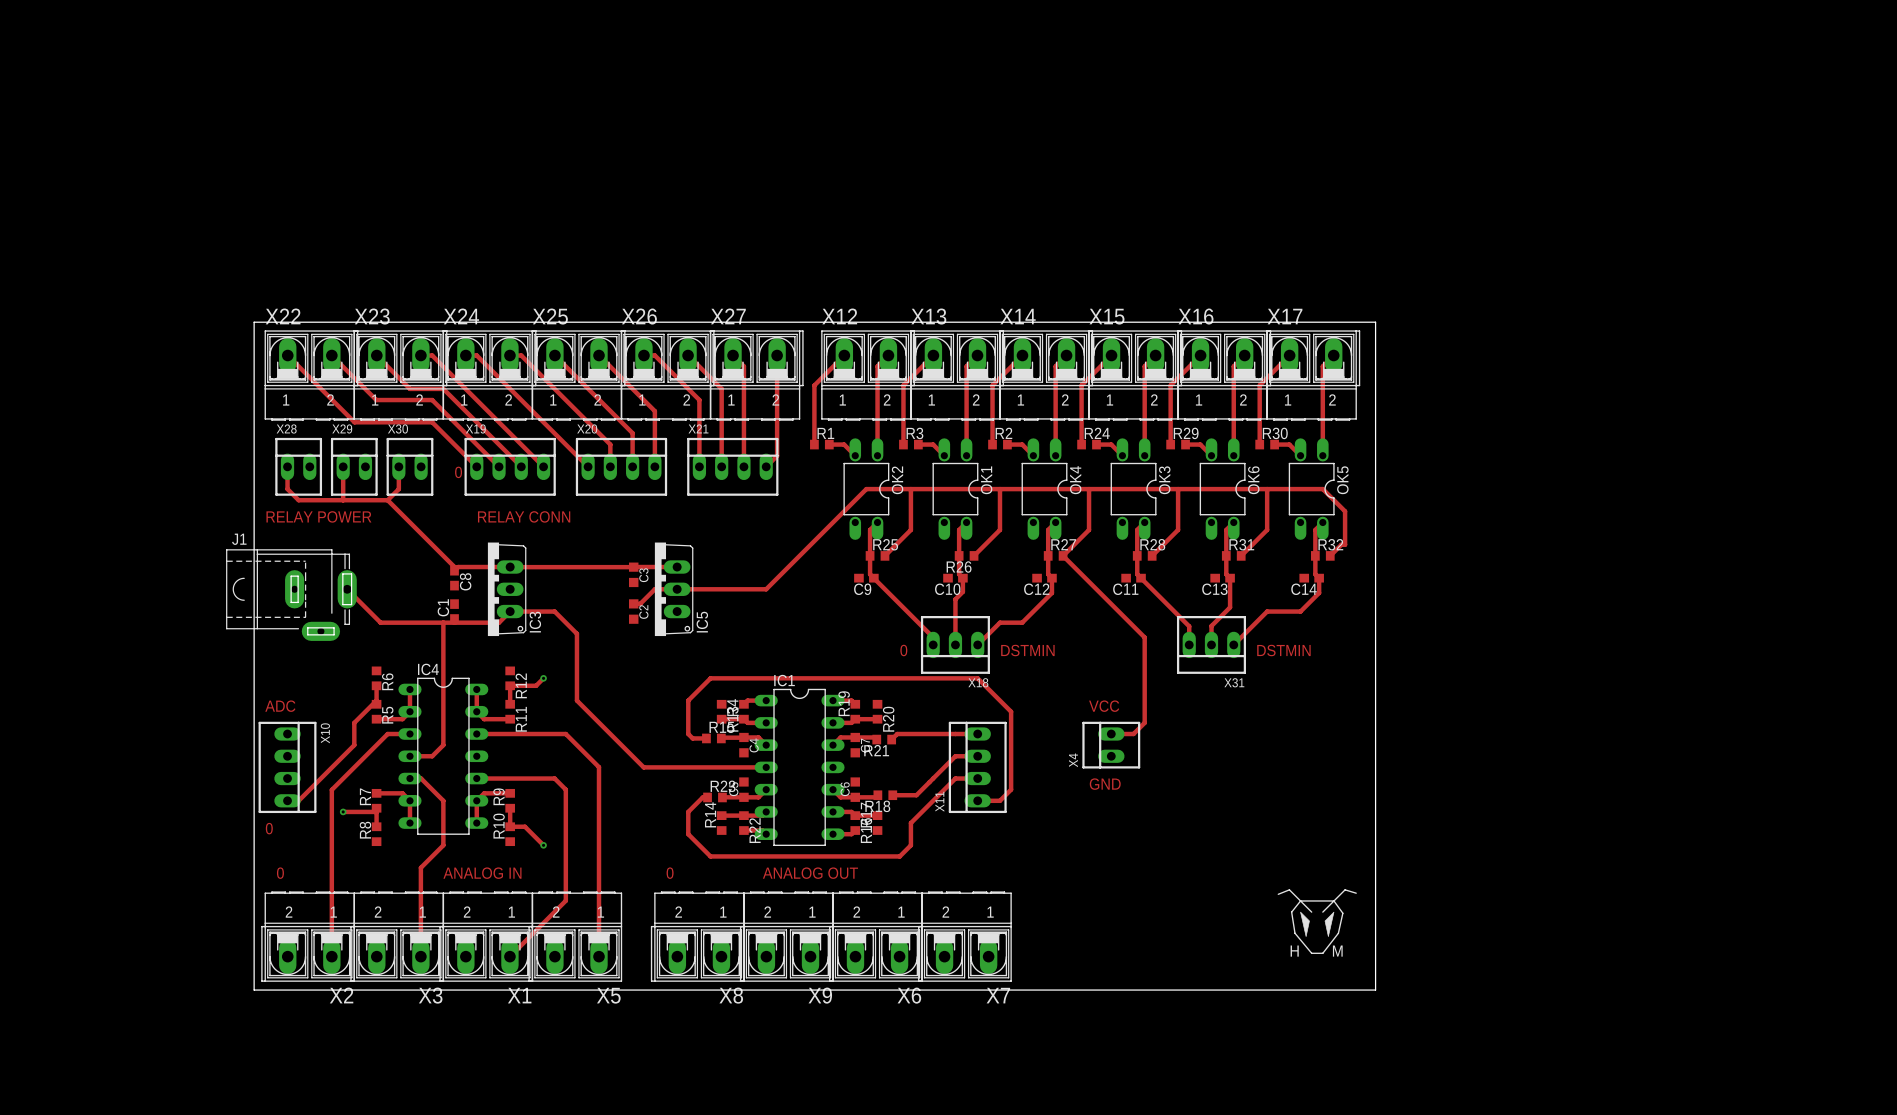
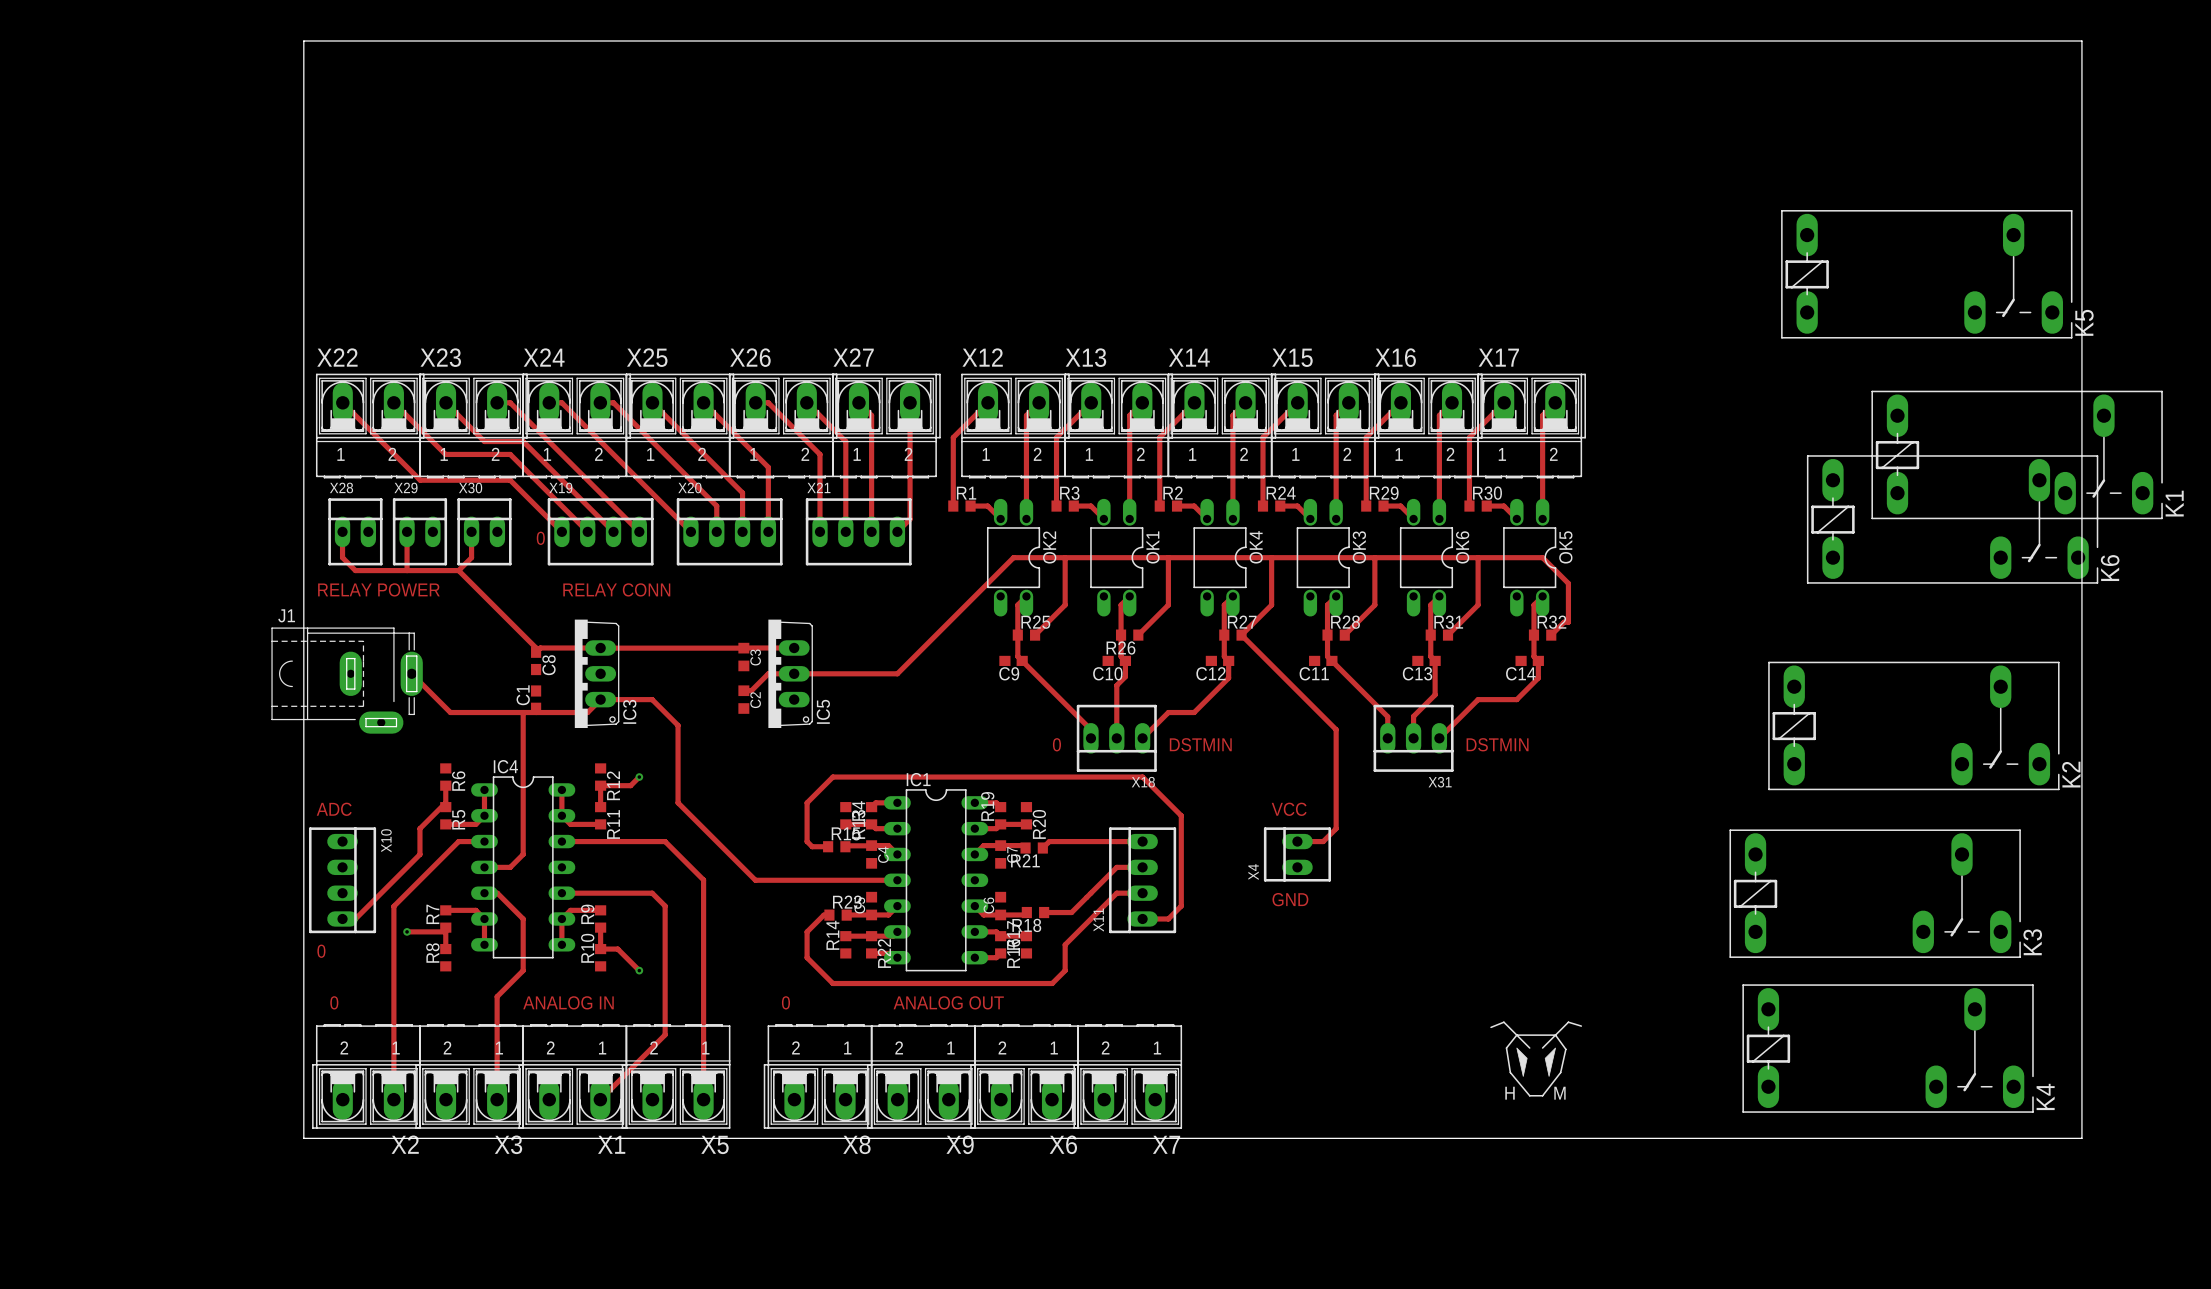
K5: none -> (1926, 274)
board edge: (254, 322) (1375, 322) (1375, 990) -> (303, 364) (303, 40) (2081, 40) (2081, 1138) (1603, 1138)
K1: none -> (2017, 454)
K6: none -> (1952, 519)
K2: none -> (1913, 725)
K3: none -> (1875, 893)
K4: none -> (1888, 1048)

